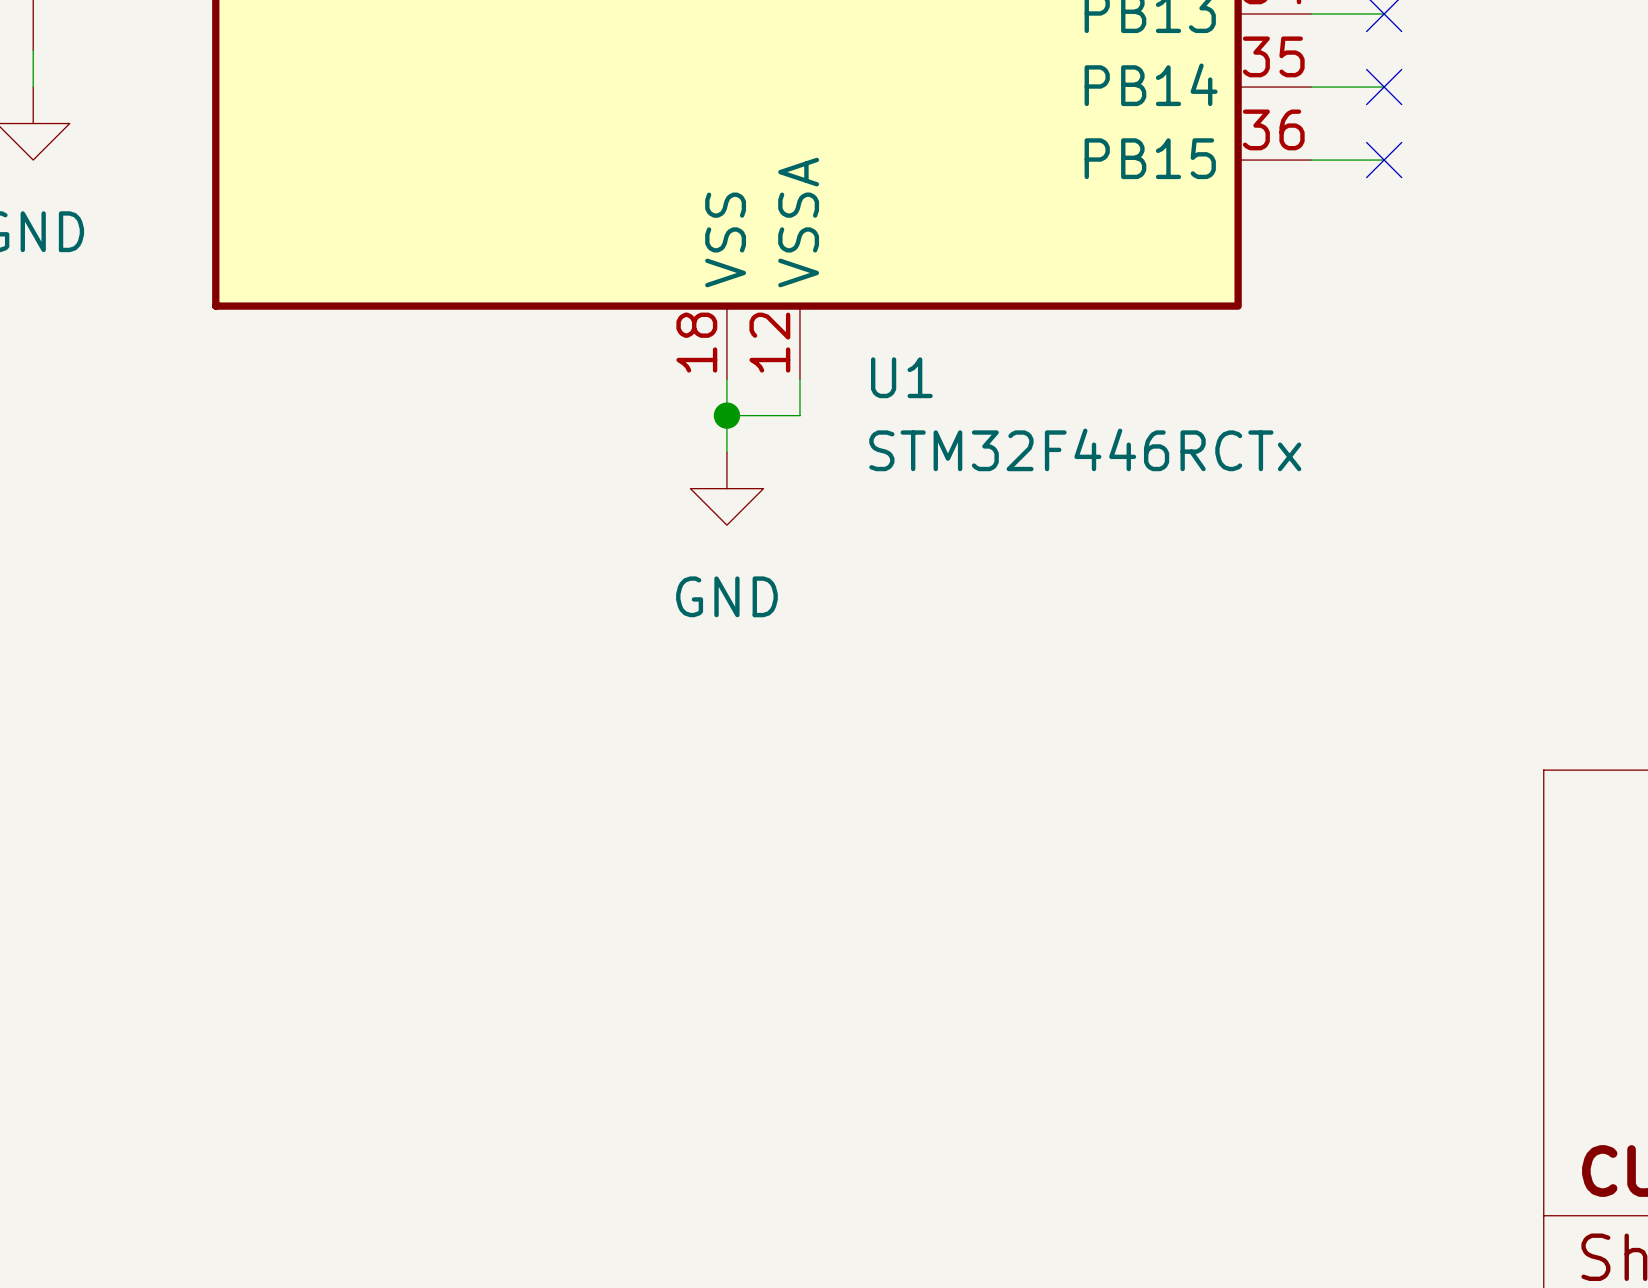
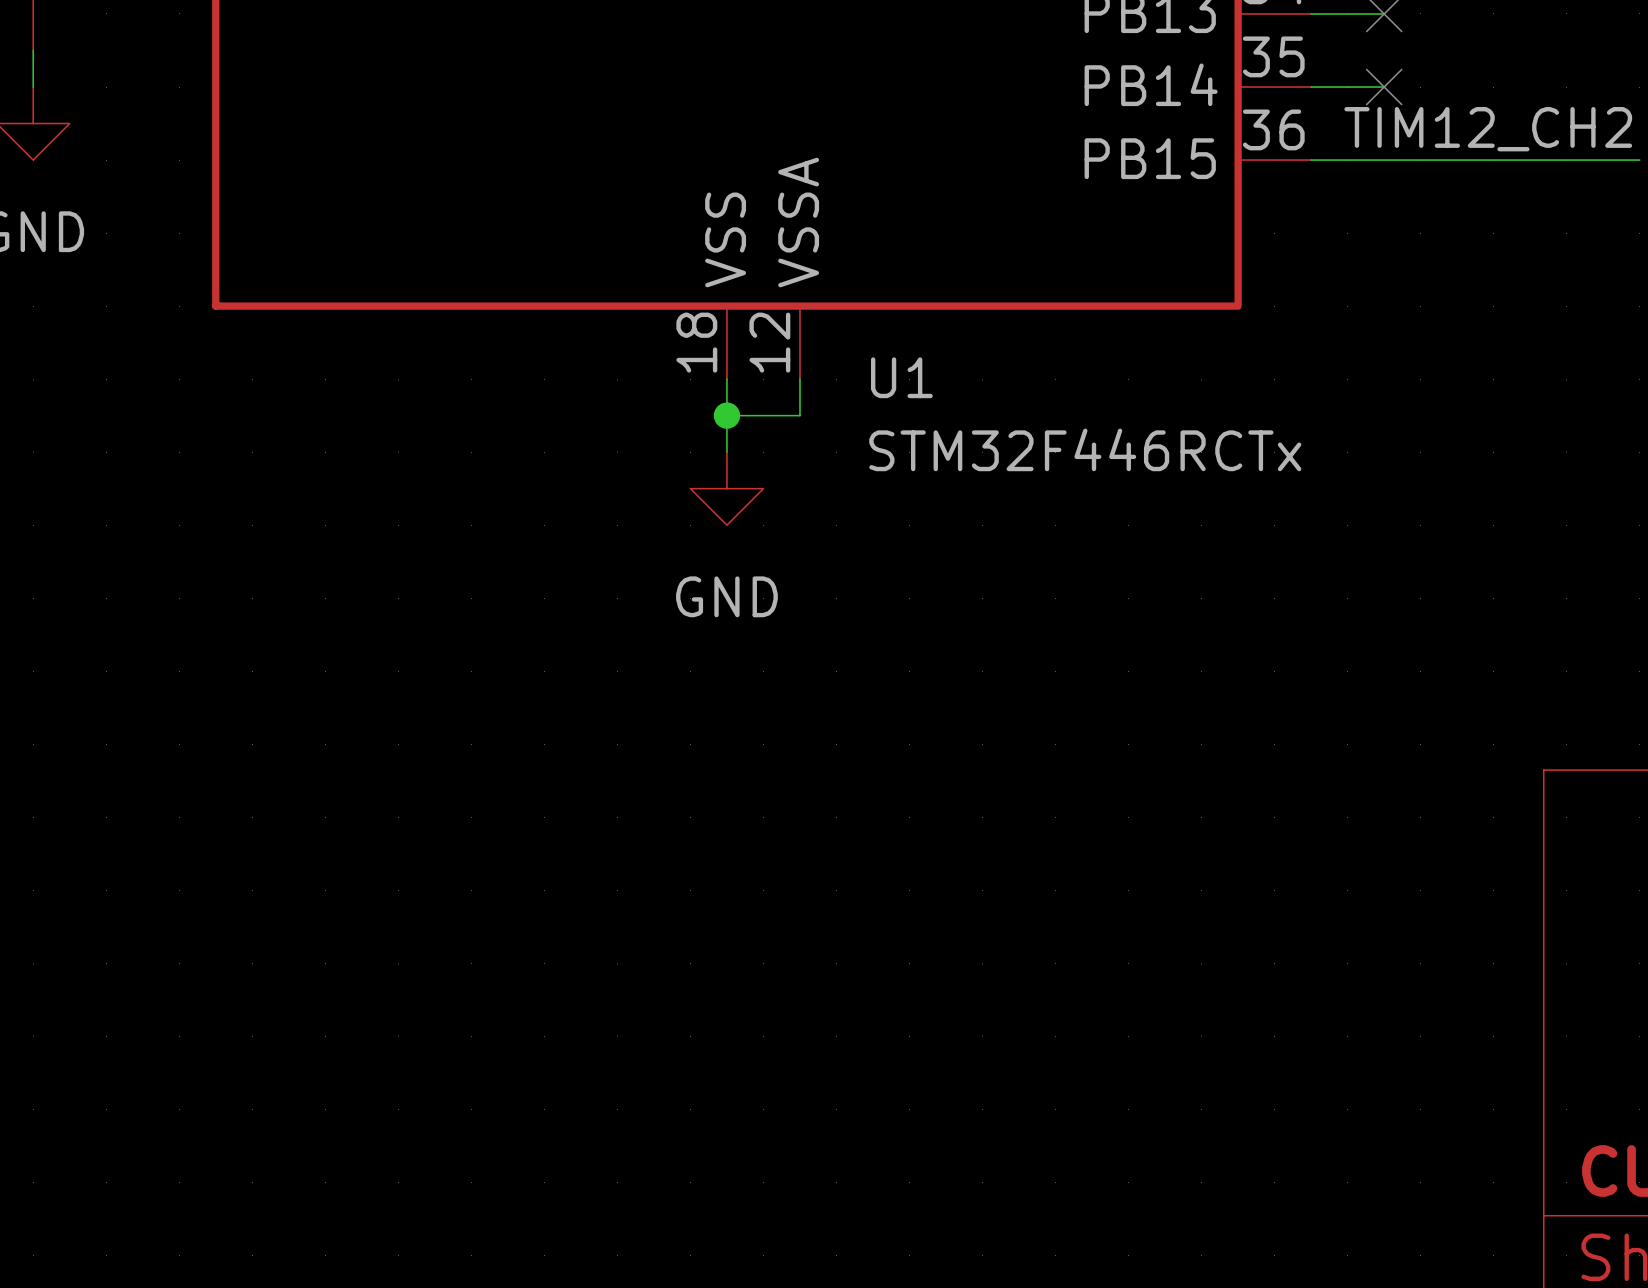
label: none -> TIM12_CH2 (1488, 129)
wire: none -> (1384, 160) (1639, 160)
no-connect mark: (1384, 160) -> none

